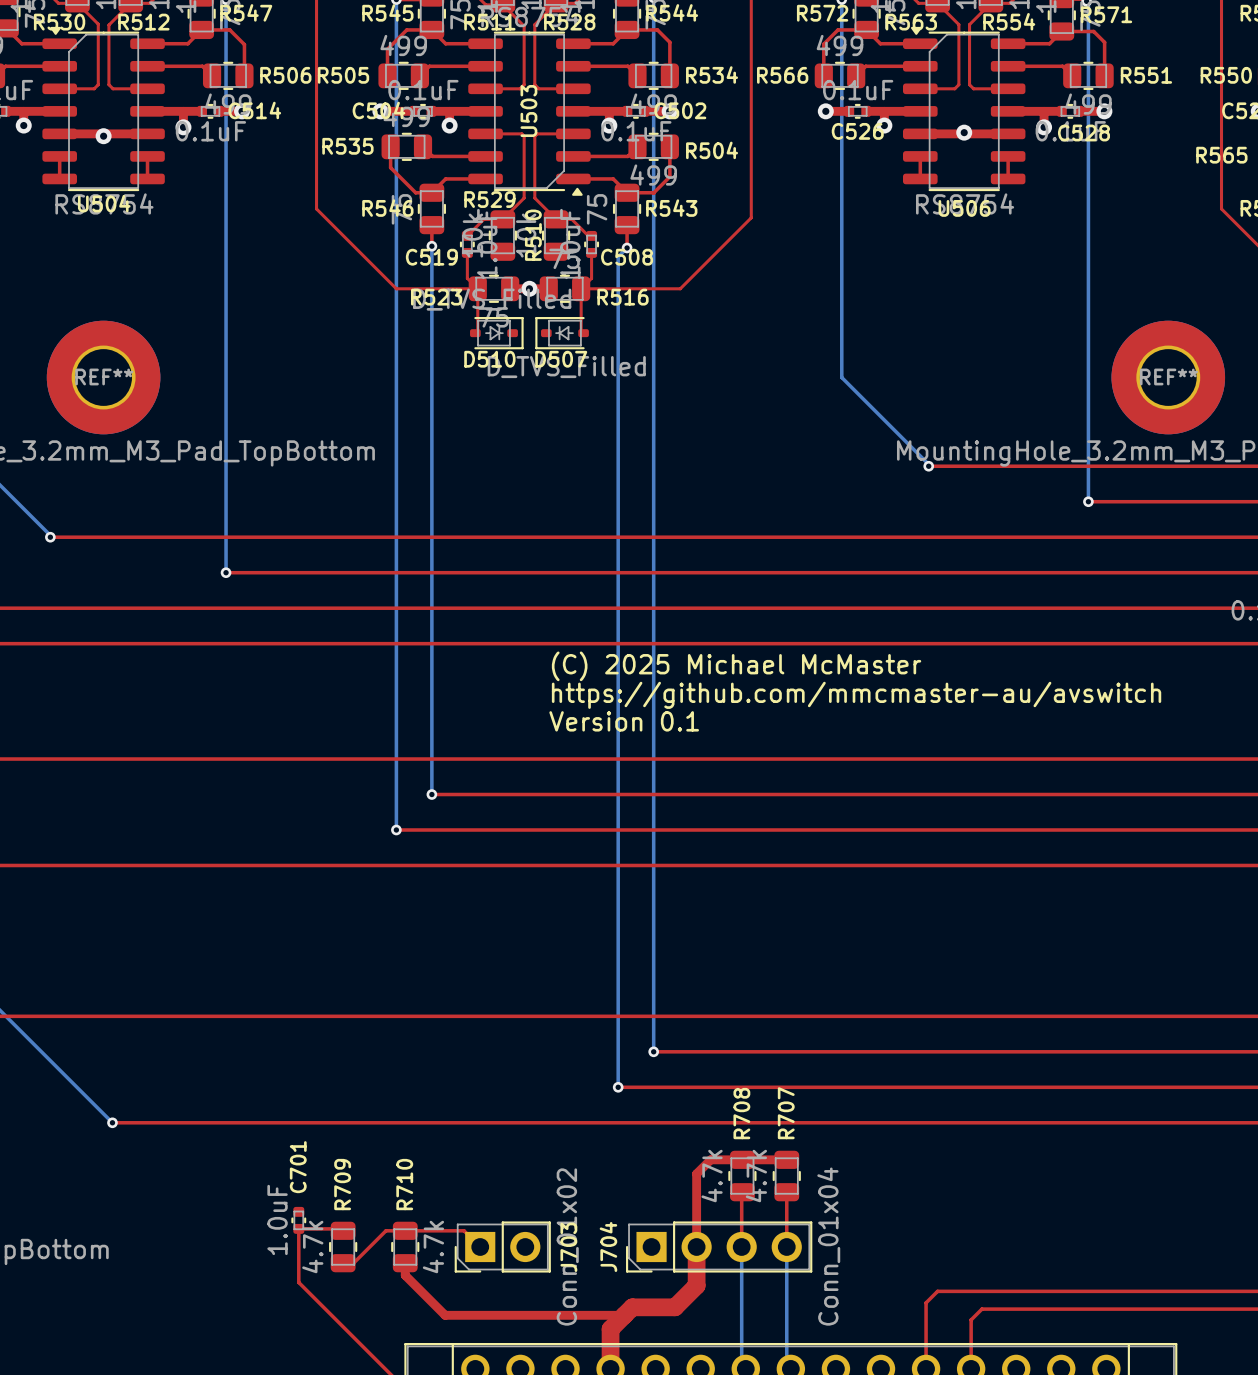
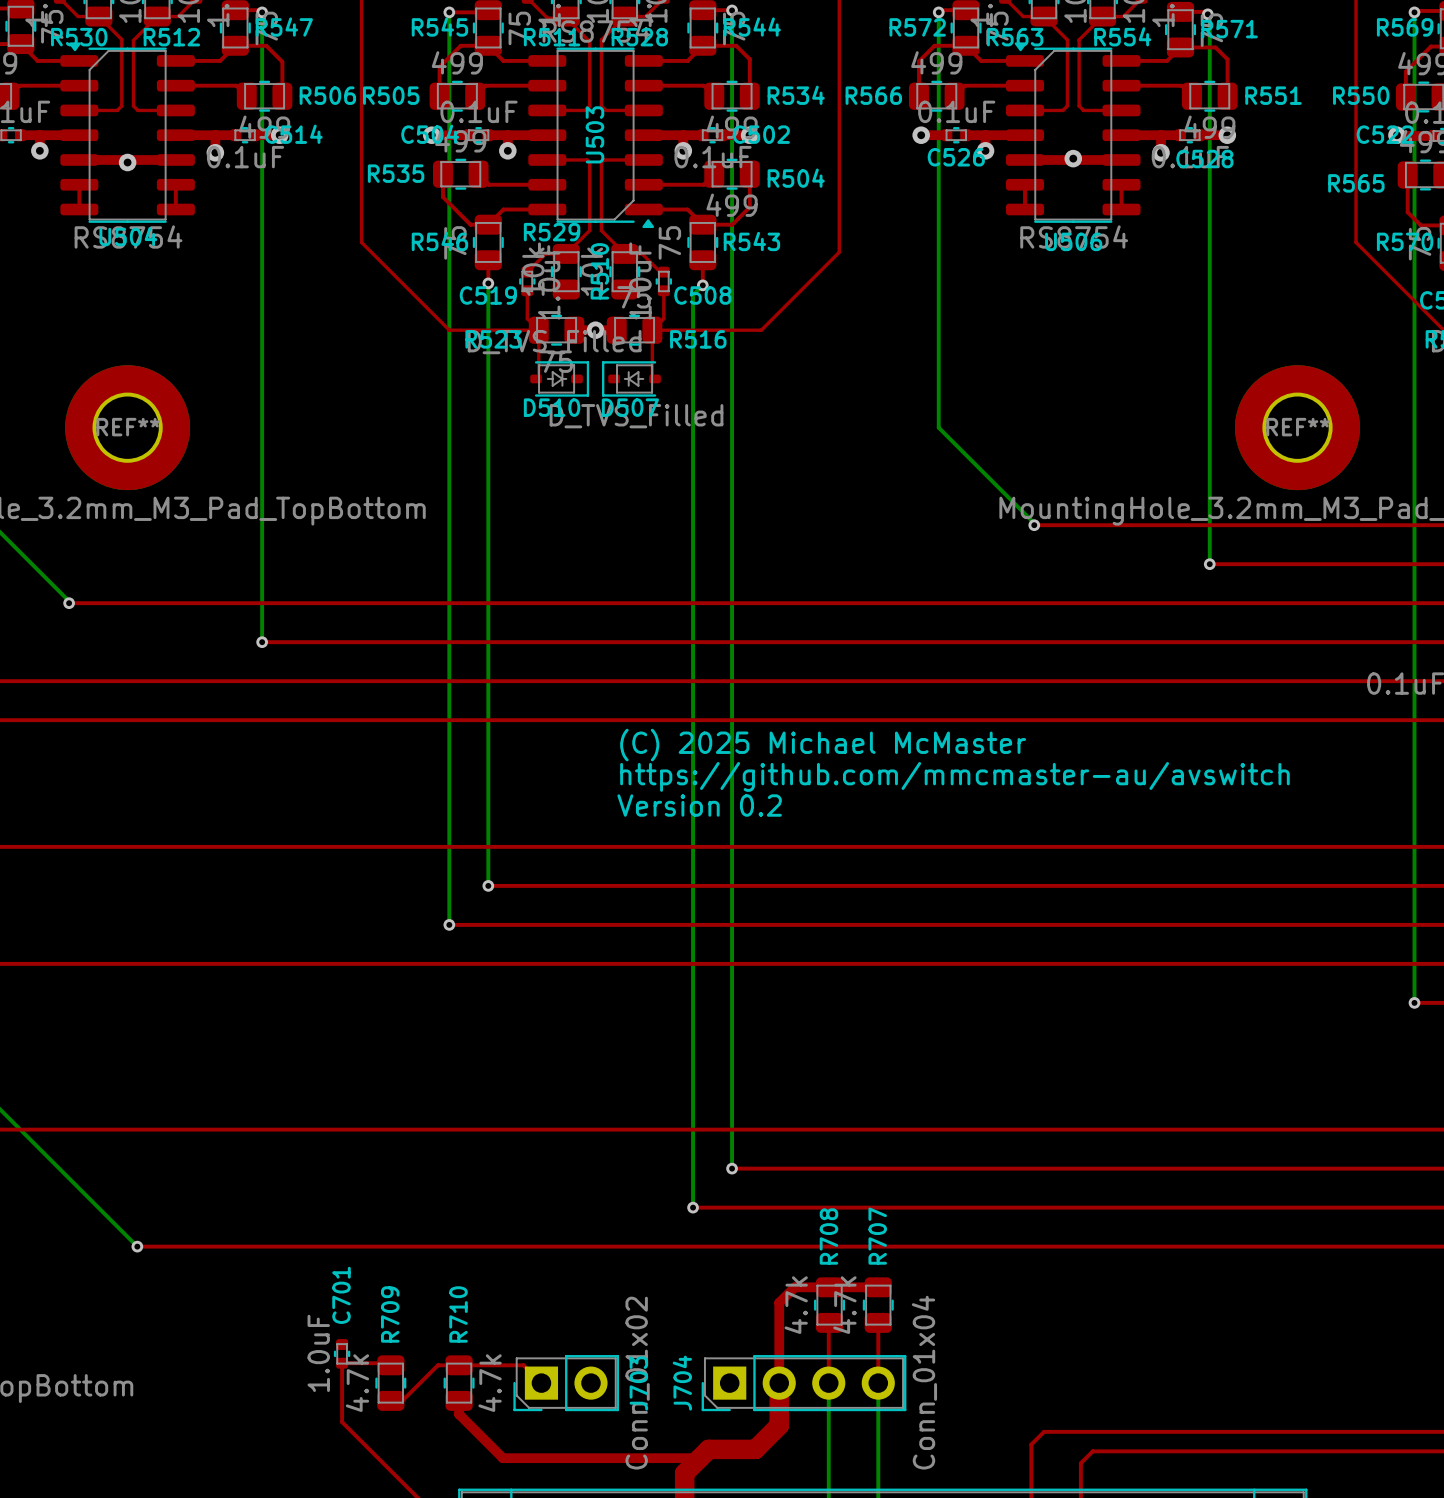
text: Version 0.1 (624, 721) -> Version 0.2 (699, 805)

